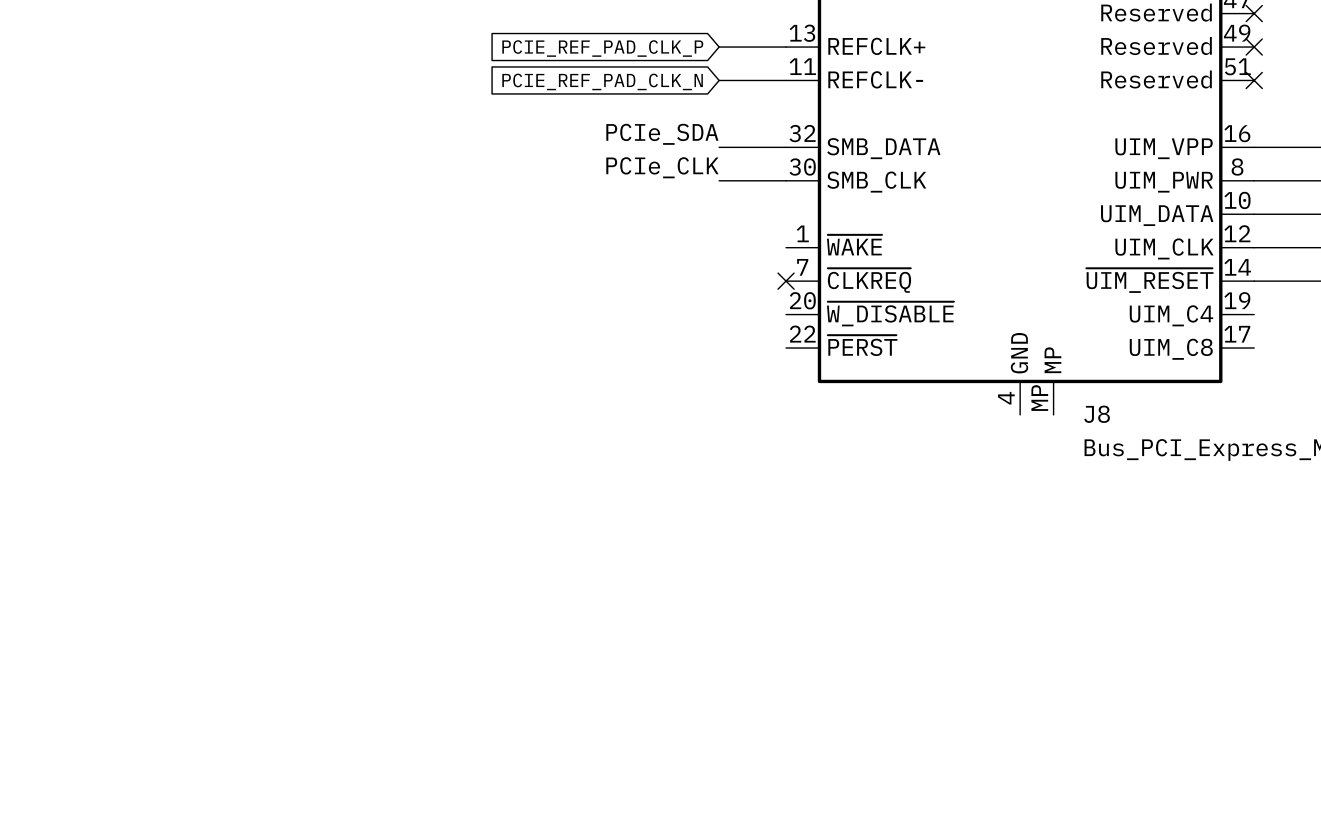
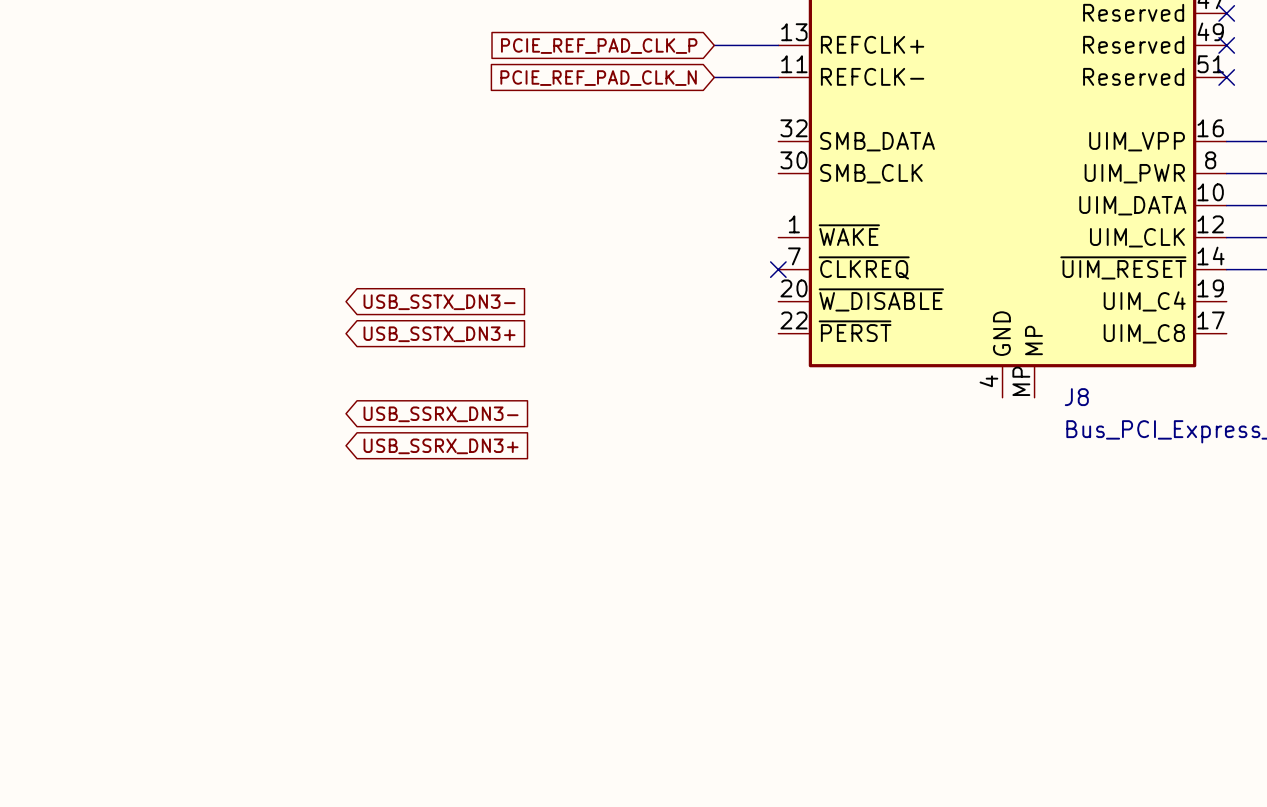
label: PCIe_SDA (662, 134) -> none
wire: (719, 147) (786, 147) -> none
label: PCIe_CLK (662, 167) -> none
wire: (719, 180) (786, 180) -> none
global label: none -> USB_SSTX_DN3- (439, 302)
global label: none -> USB_SSTX_DN3+ (439, 334)
global label: none -> USB_SSRX_DN3- (441, 414)
global label: none -> USB_SSRX_DN3+ (441, 446)

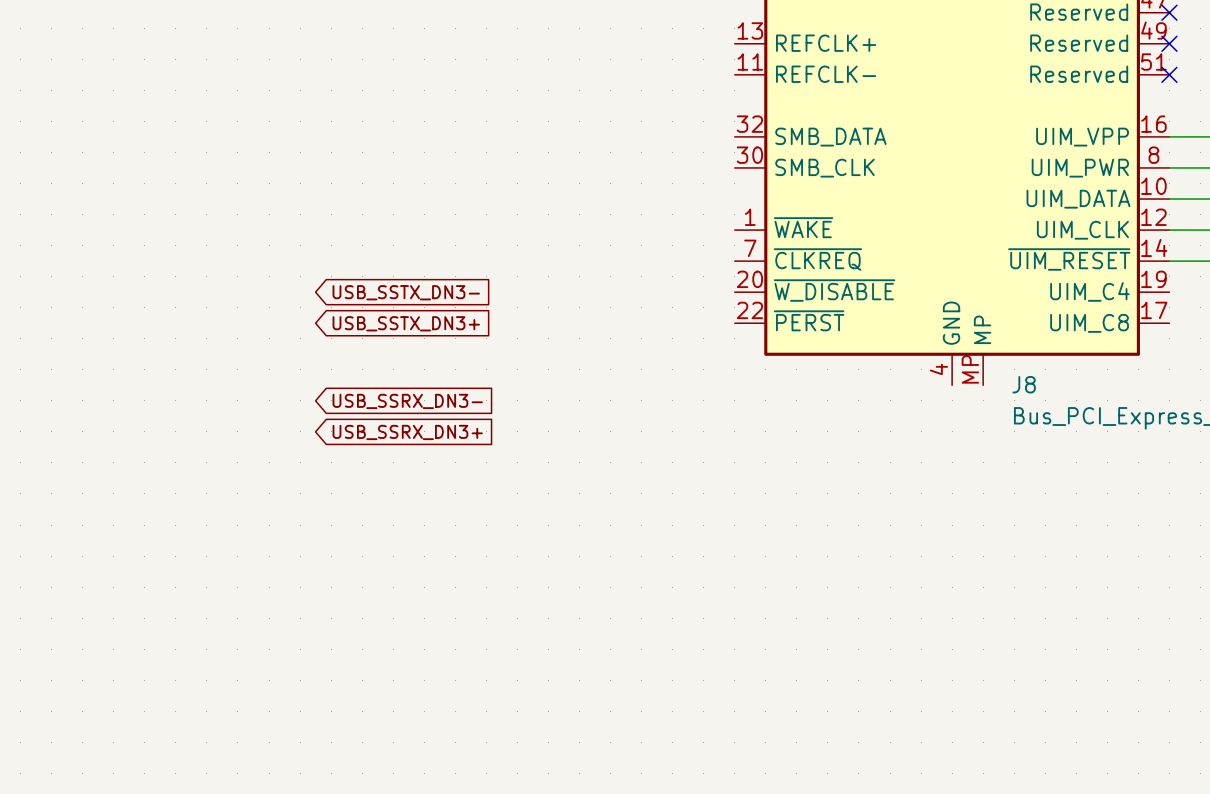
wire: (714, 45) (778, 45) -> none
global label: PCIE_REF_PAD_CLK_P (599, 46) -> none
wire: (714, 77) (778, 77) -> none
global label: PCIE_REF_PAD_CLK_N (598, 78) -> none
no-connect mark: (778, 269) -> none

